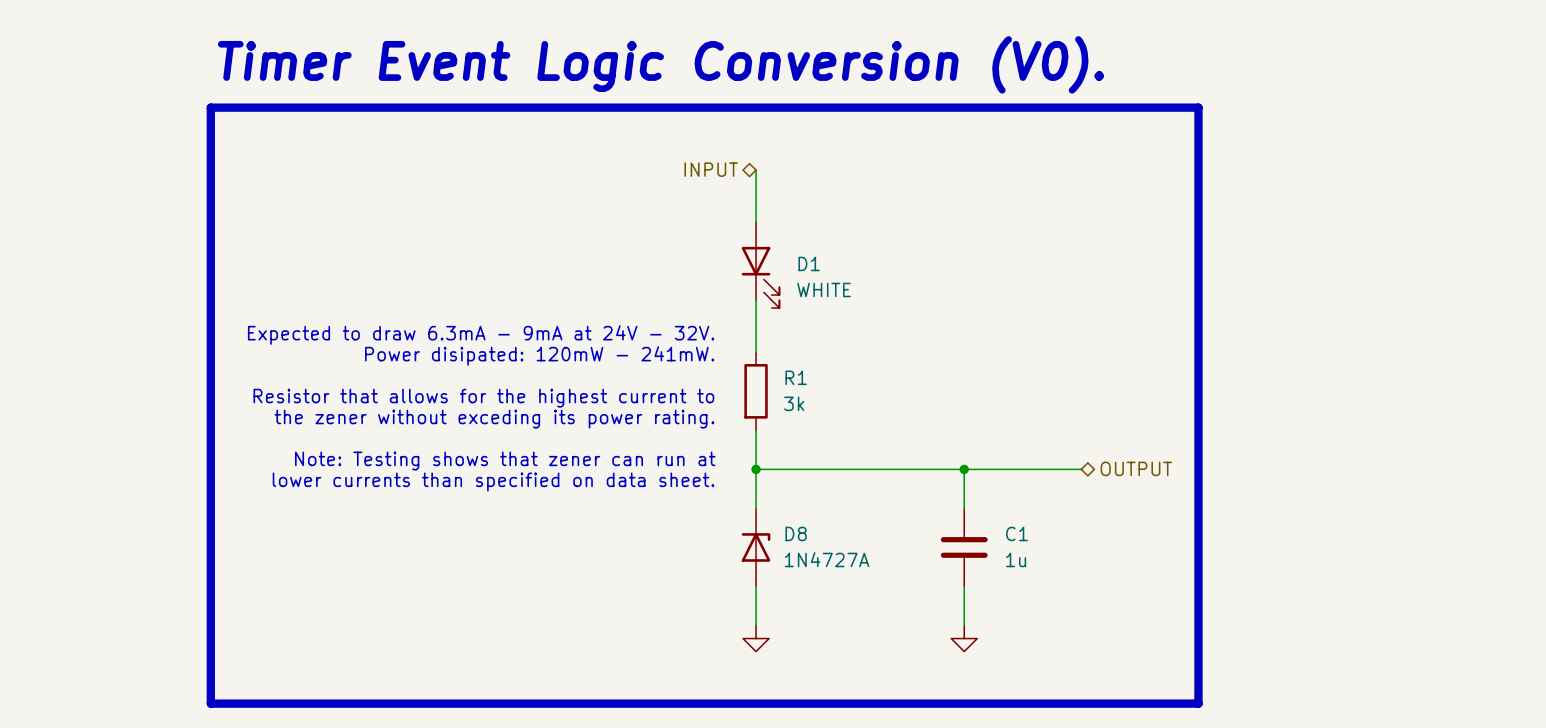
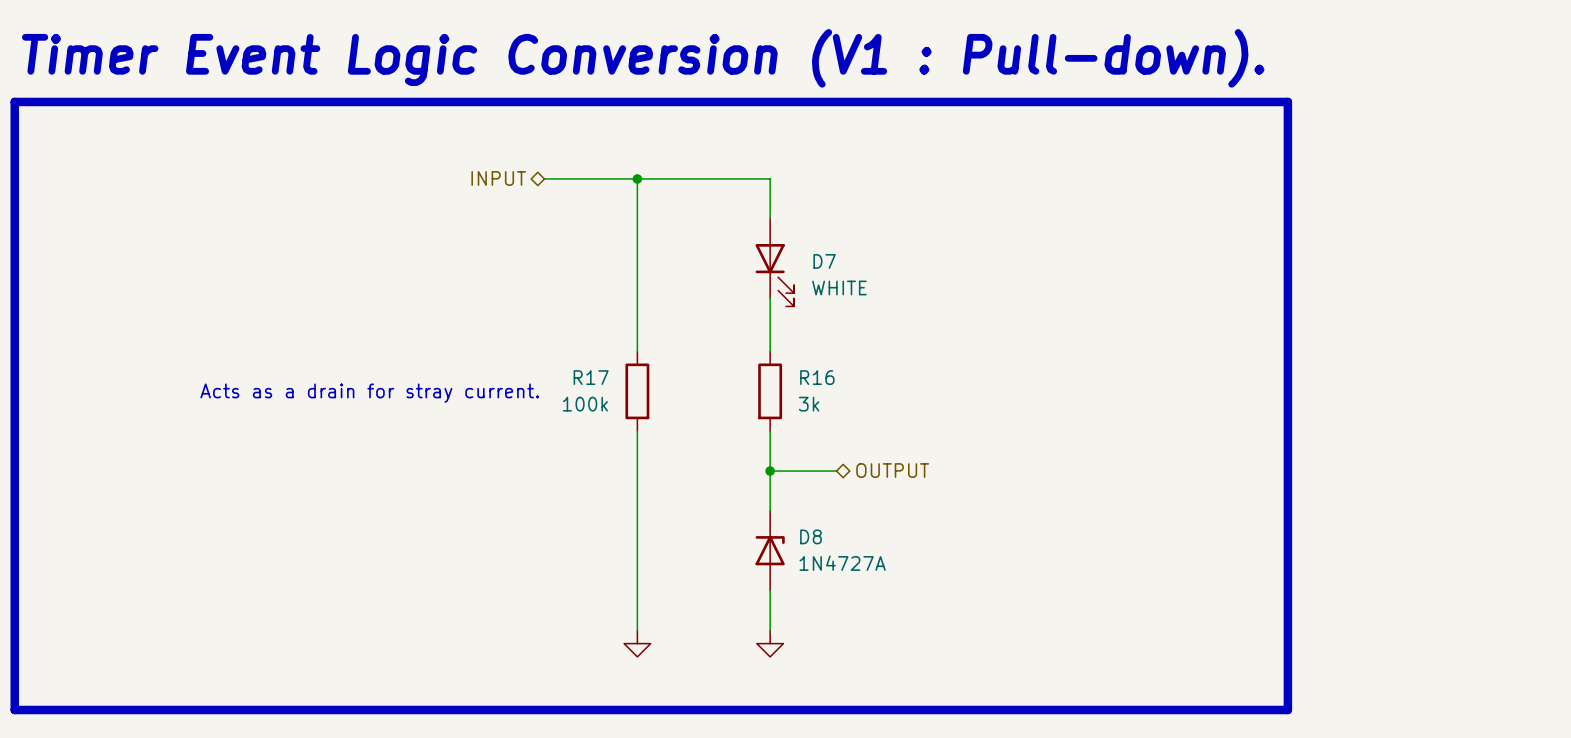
text: Timer Event Logic Conversion (V0). (661, 64) -> Timer Event Logic Conversion (V1 : Pull-down). (643, 58)
line: (210, 107) (210, 703) -> (213, 101) (14, 101) (14, 709) (213, 709)
line: (1198, 107) (1198, 703) -> (1221, 101) (1287, 101) (1287, 709) (1221, 709)
hierarchical label position: INPUT (711, 169) -> INPUT (498, 178)
wire: (756, 170) (756, 183) -> (544, 178) (770, 178)
wire: none -> (637, 178) (637, 351)
junction: none -> (637, 178)
D1 name: D1 (809, 263) -> D7 (824, 261)
text: Expected to draw 6.3mA - 9mA at 24V - 32V. (481, 335) -> none
text: Power disipated: 120mW - 241mW. (539, 355) -> none
R1 name: R1 (796, 377) -> R16 (817, 377)
R17: none -> 100k (637, 391)
text: none -> Acts as a drain for stray current. (369, 393)
text: Resistor that allows for the highest current to (483, 398) -> none
text: the zener without exceding its power rating. (494, 419) -> none
wire: none -> (637, 431) (637, 630)
text: Note: Testing shows that zener can run at (505, 461) -> none
hierarchical label: none -> OUTPUT (892, 470)
hierarchical label: OUTPUT (1136, 468) -> none
wire: (821, 469) (1081, 469) -> none
wire: (964, 469) (964, 508) -> none
junction: (964, 469) -> none
text: lower currents than specified on data sheet. (493, 481) -> none
C1: 1u (964, 547) -> none
wire: (964, 586) (964, 625) -> none
power symbol: none -> (637, 643)
power symbol: (964, 638) -> none

